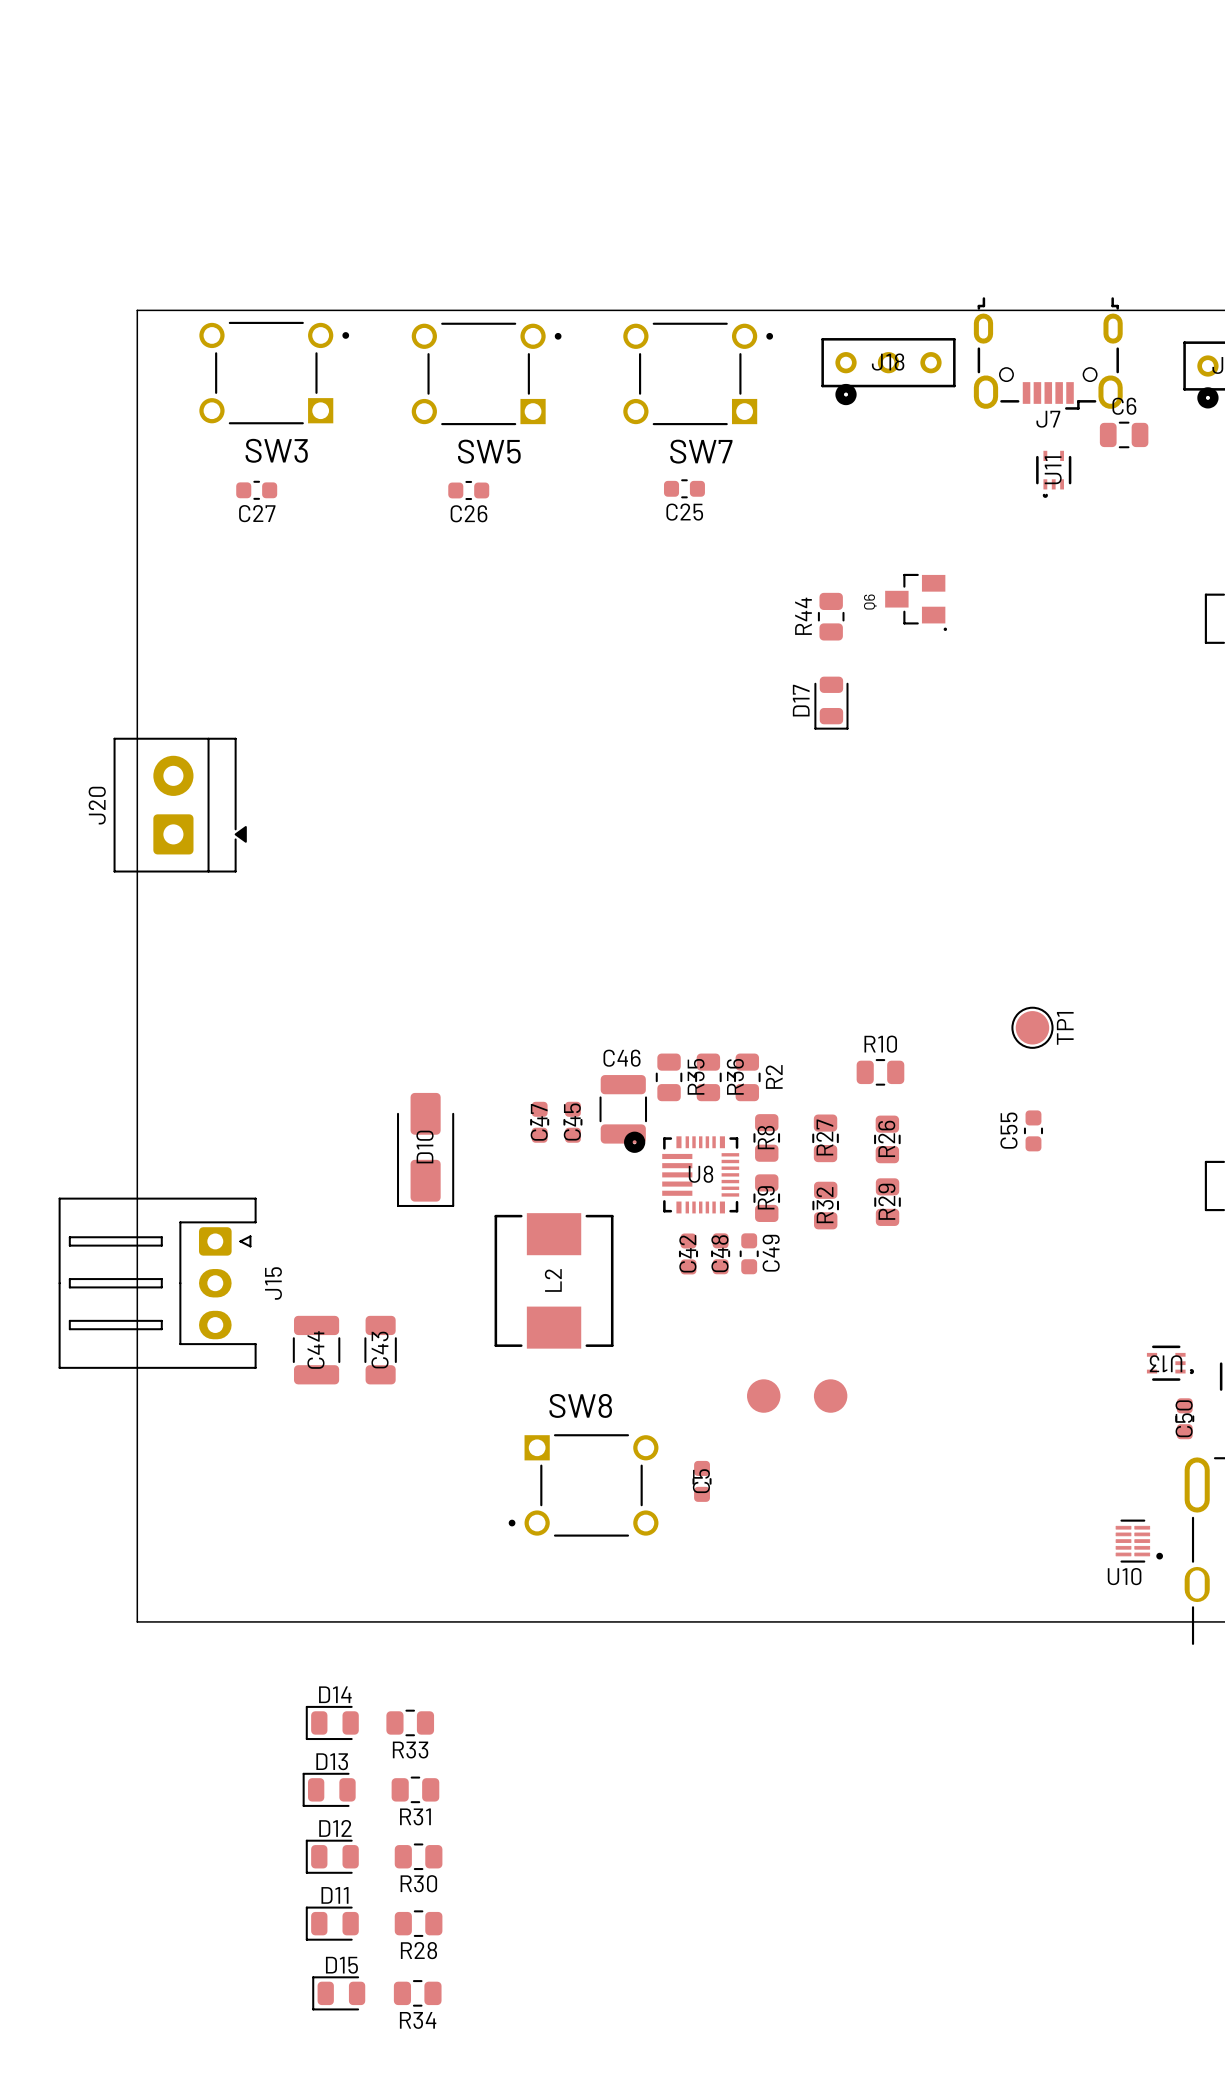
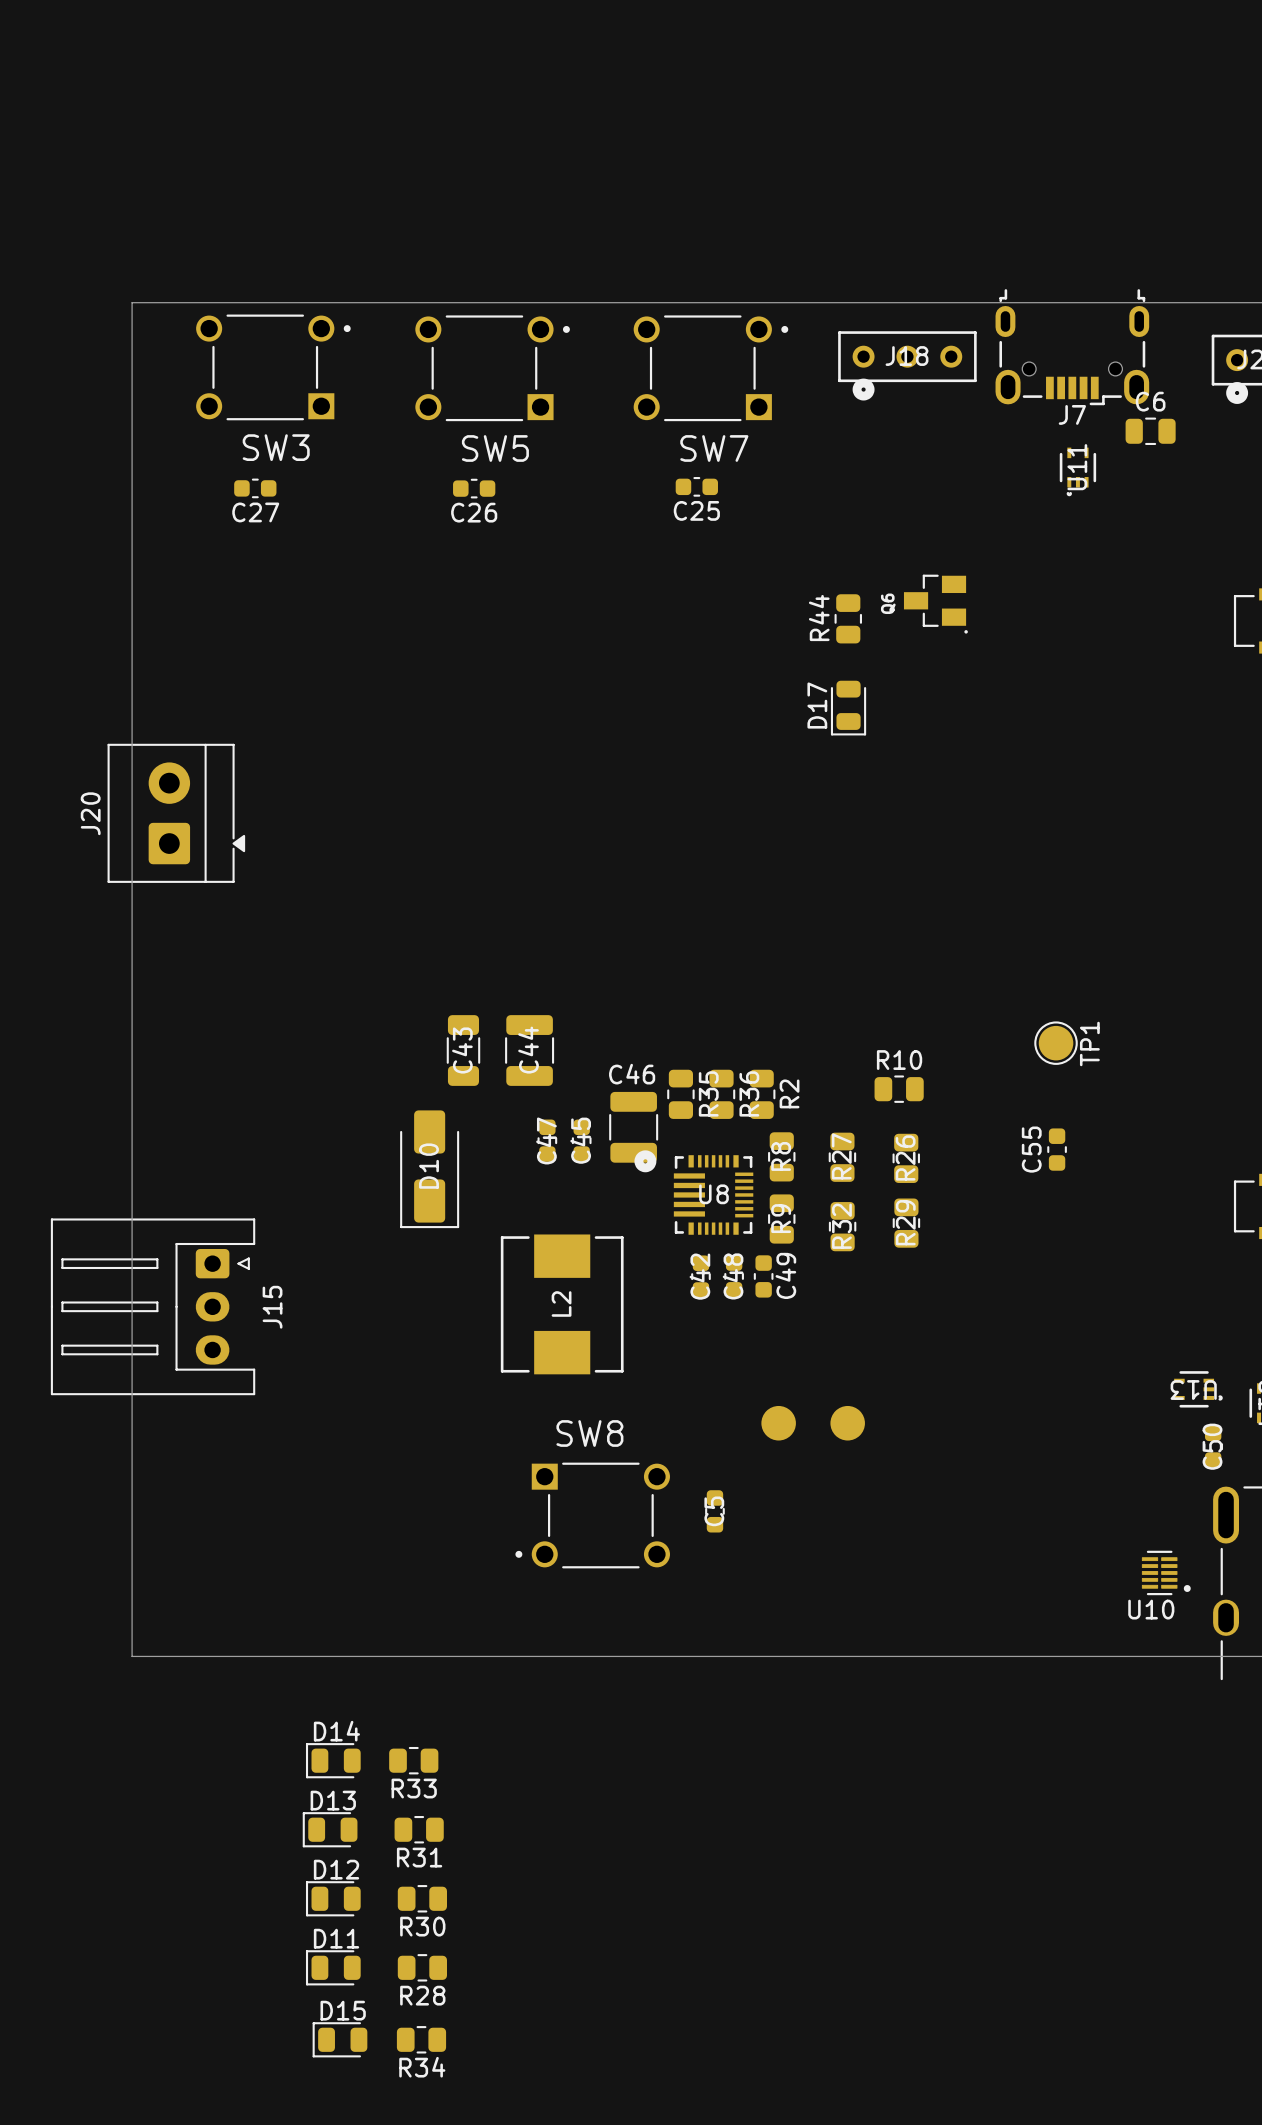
C44 position: (316, 1350) -> (529, 1050)
C43 position: (380, 1350) -> (463, 1050)

